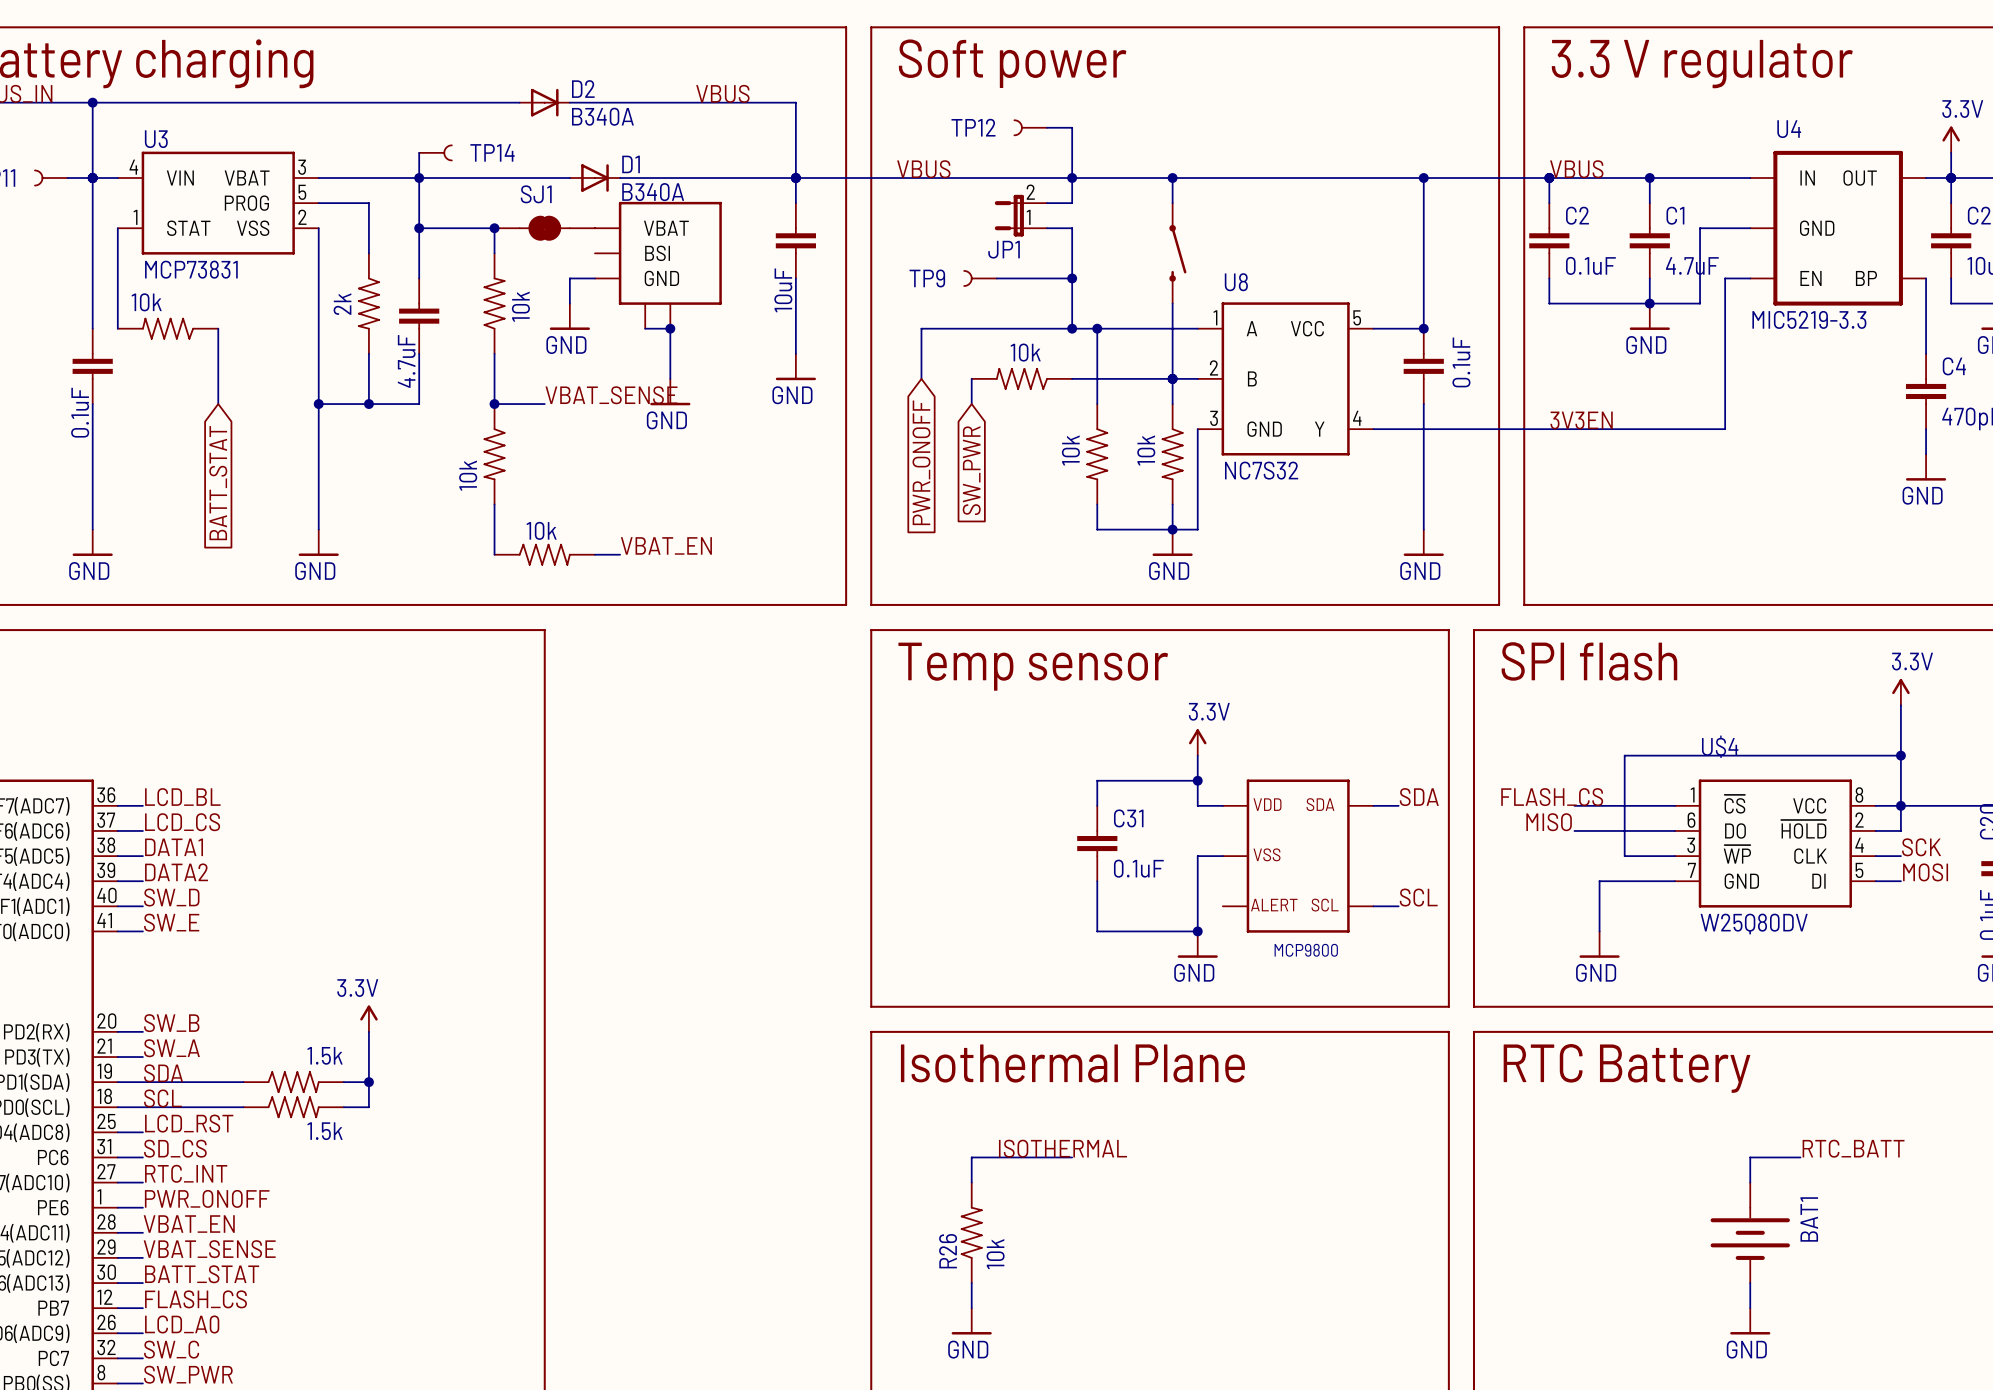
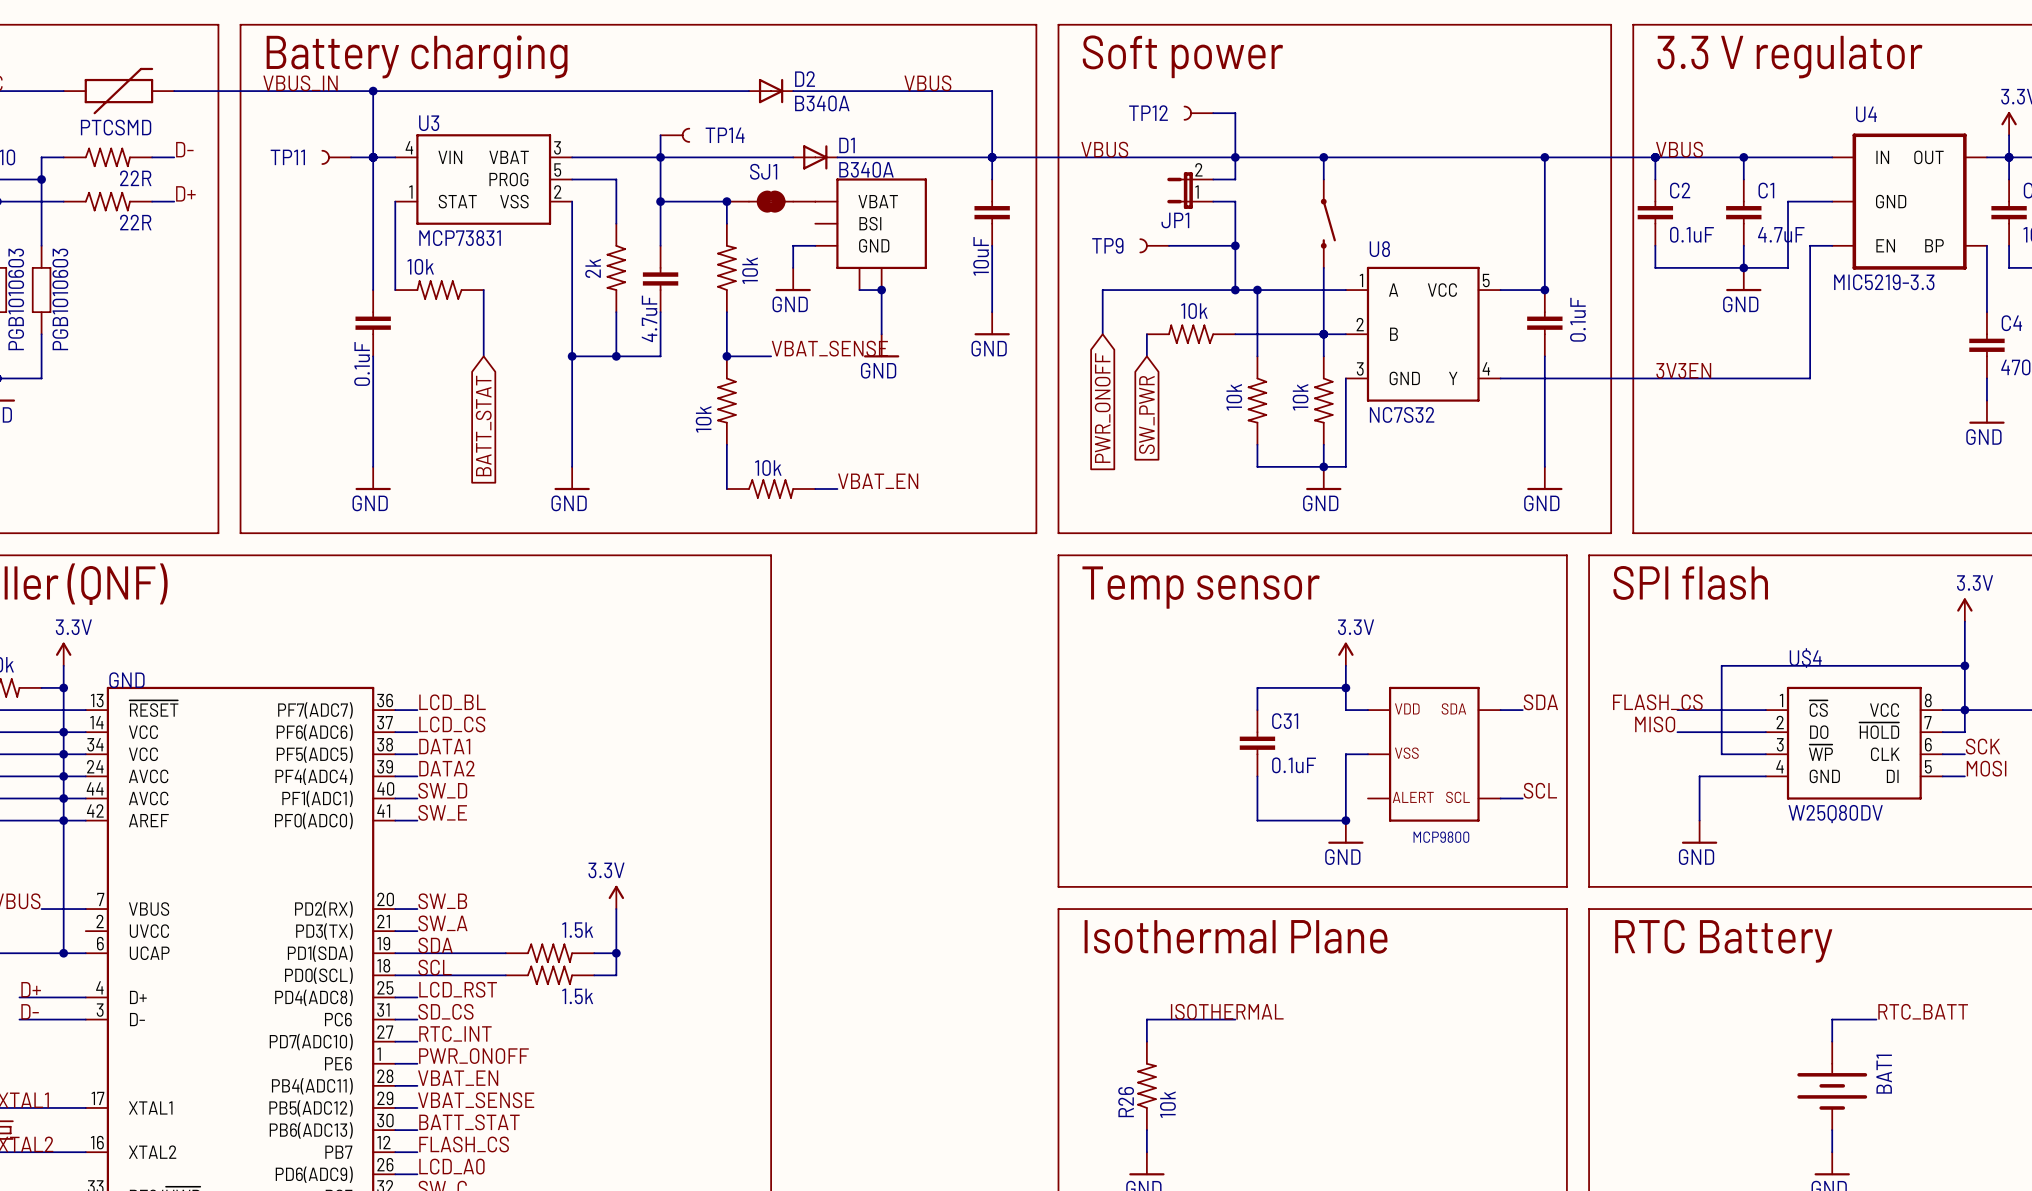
U$4 pin number: 6 (1691, 820) -> 2 (1780, 722)
U$4 pin number: 2 (1859, 820) -> 7 (1928, 722)
U$4 pin number: 4 (1859, 845) -> 6 (1928, 744)
U$4 pin number: 7 (1691, 870) -> 4 (1779, 766)

